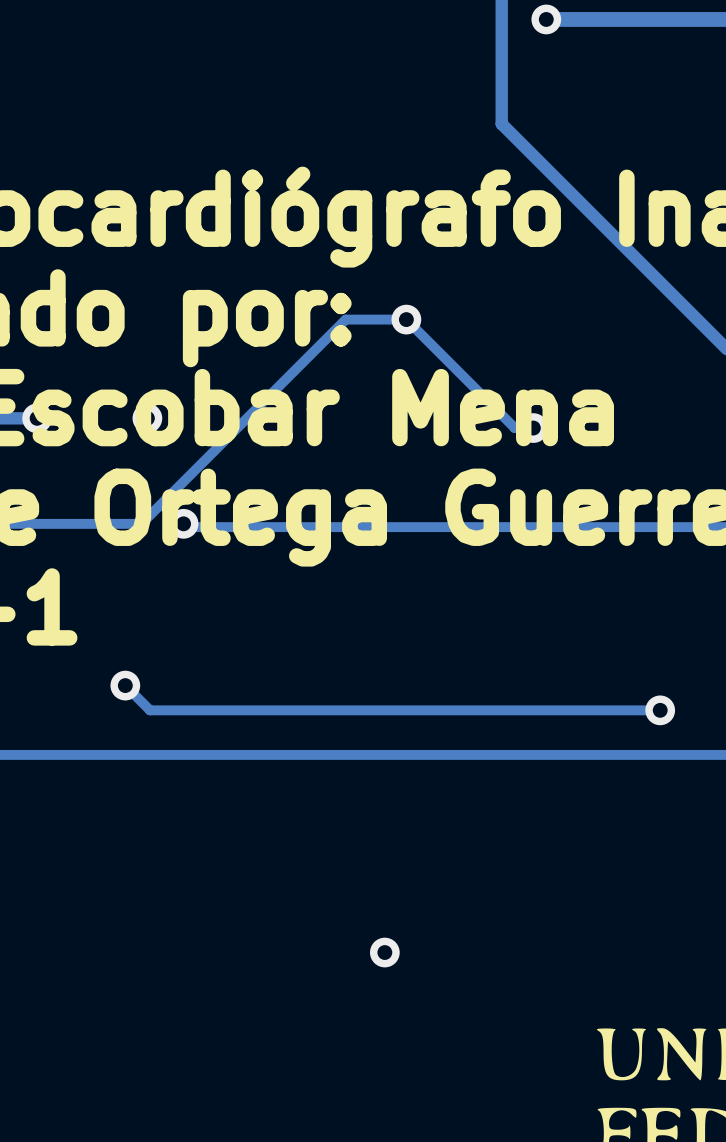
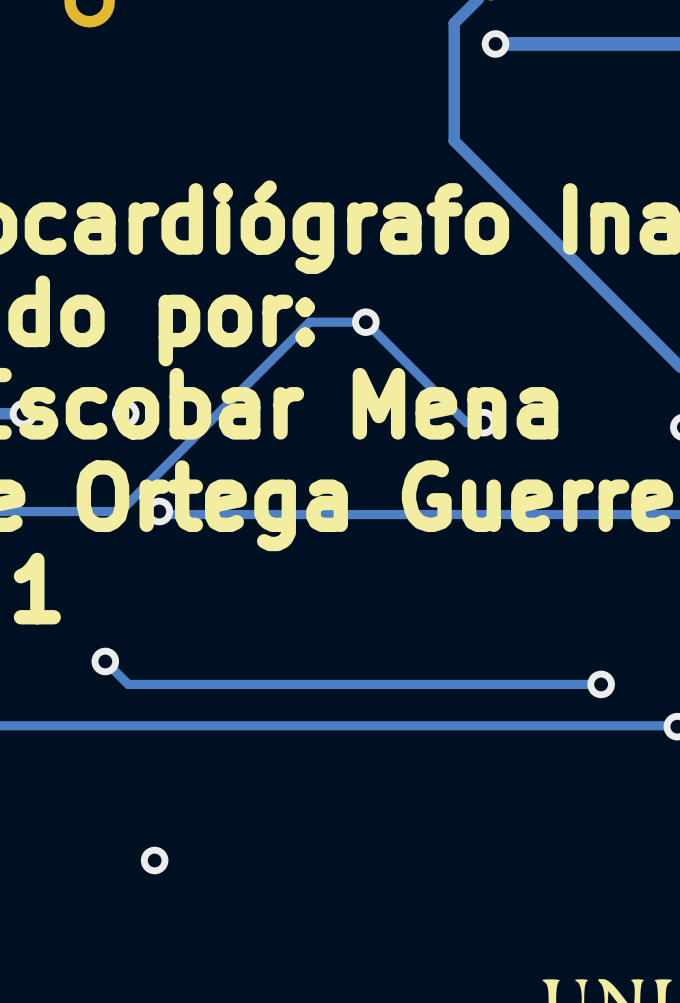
via position: (384, 952) -> (154, 860)

